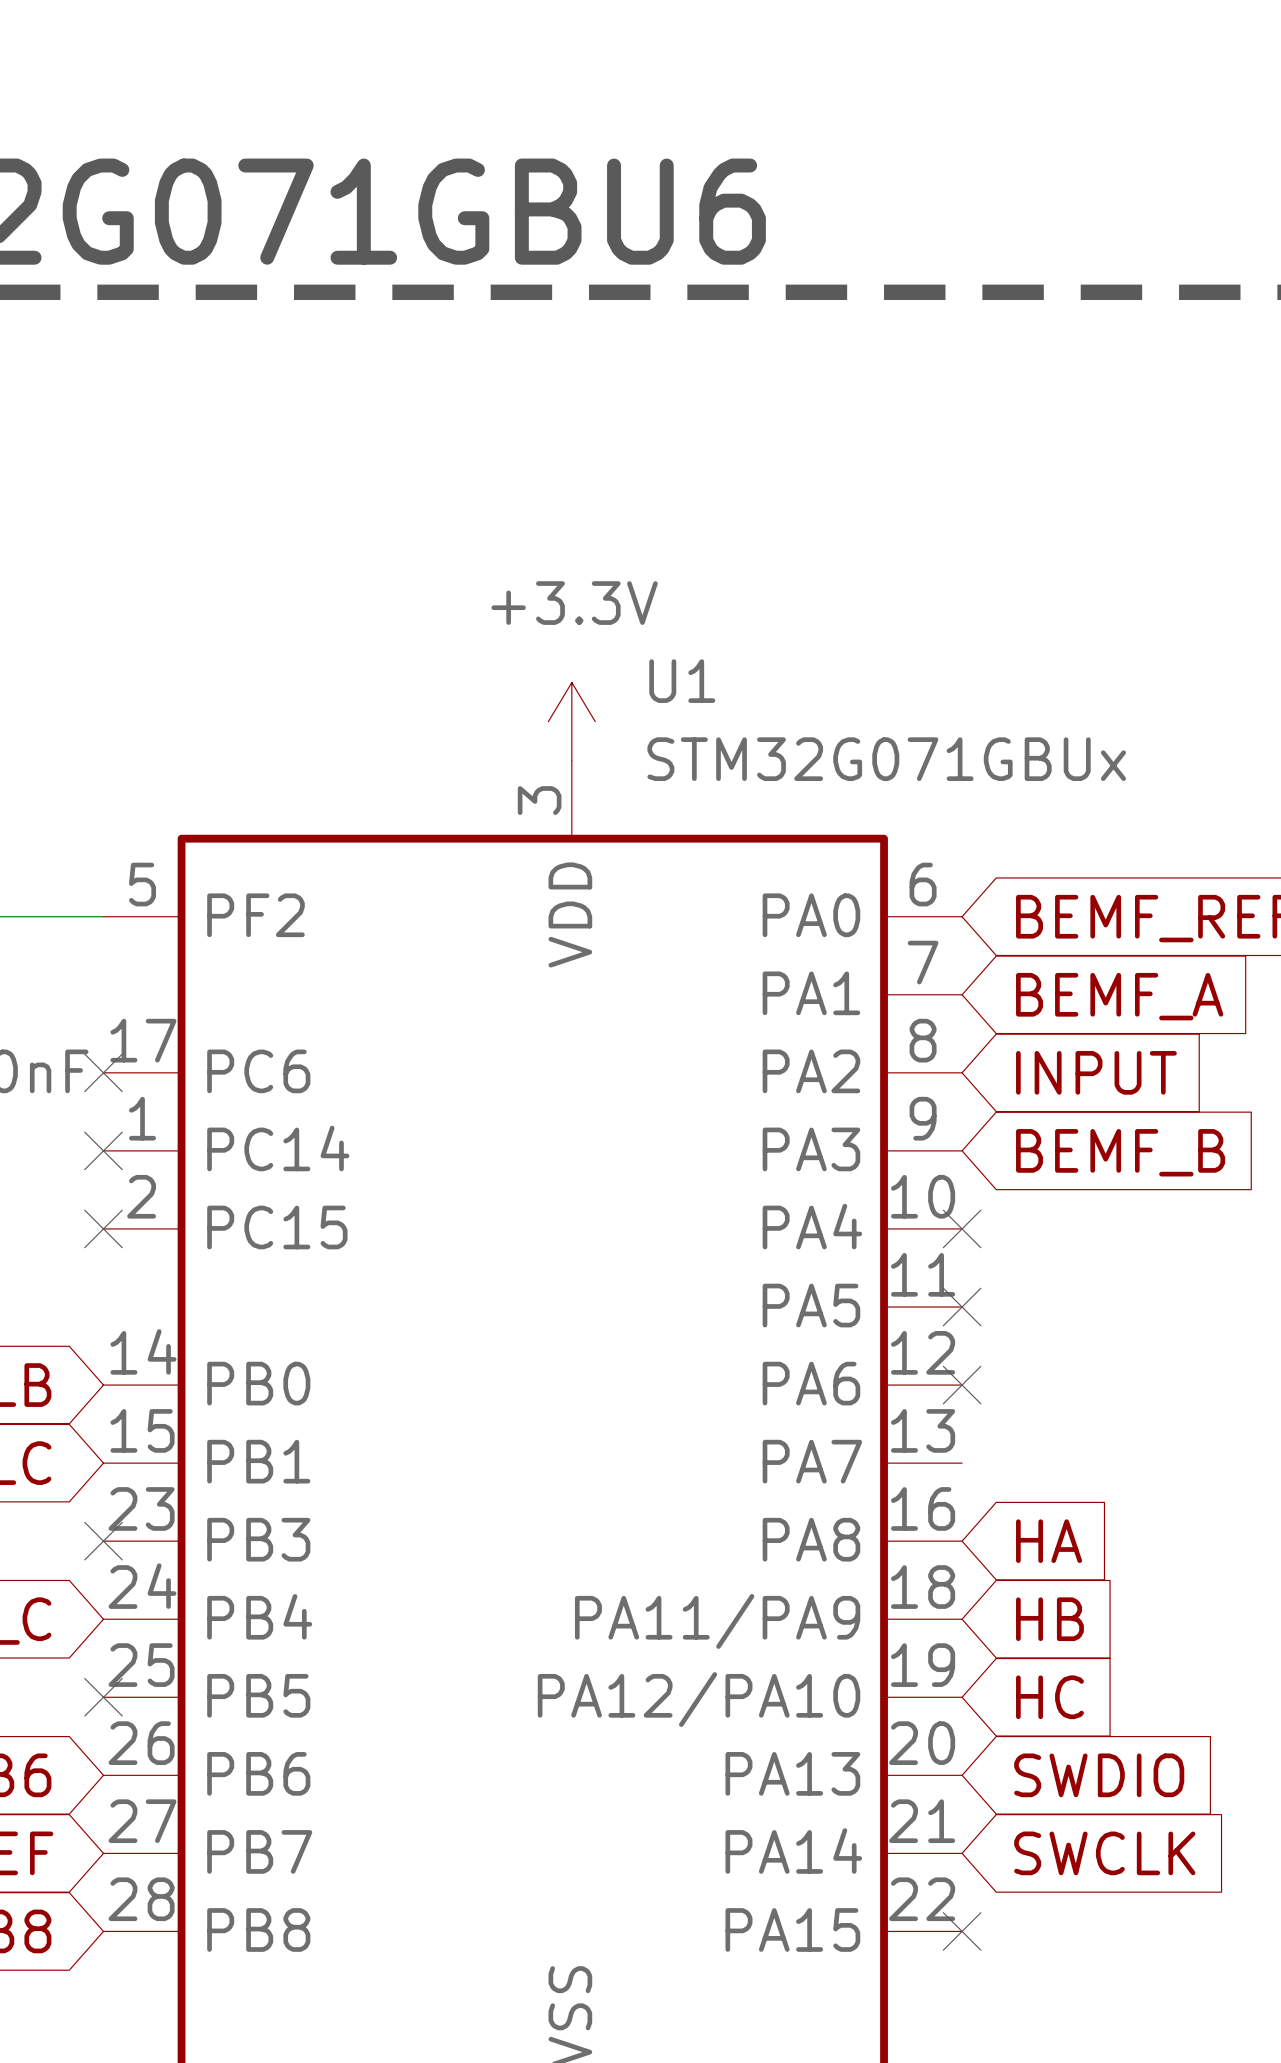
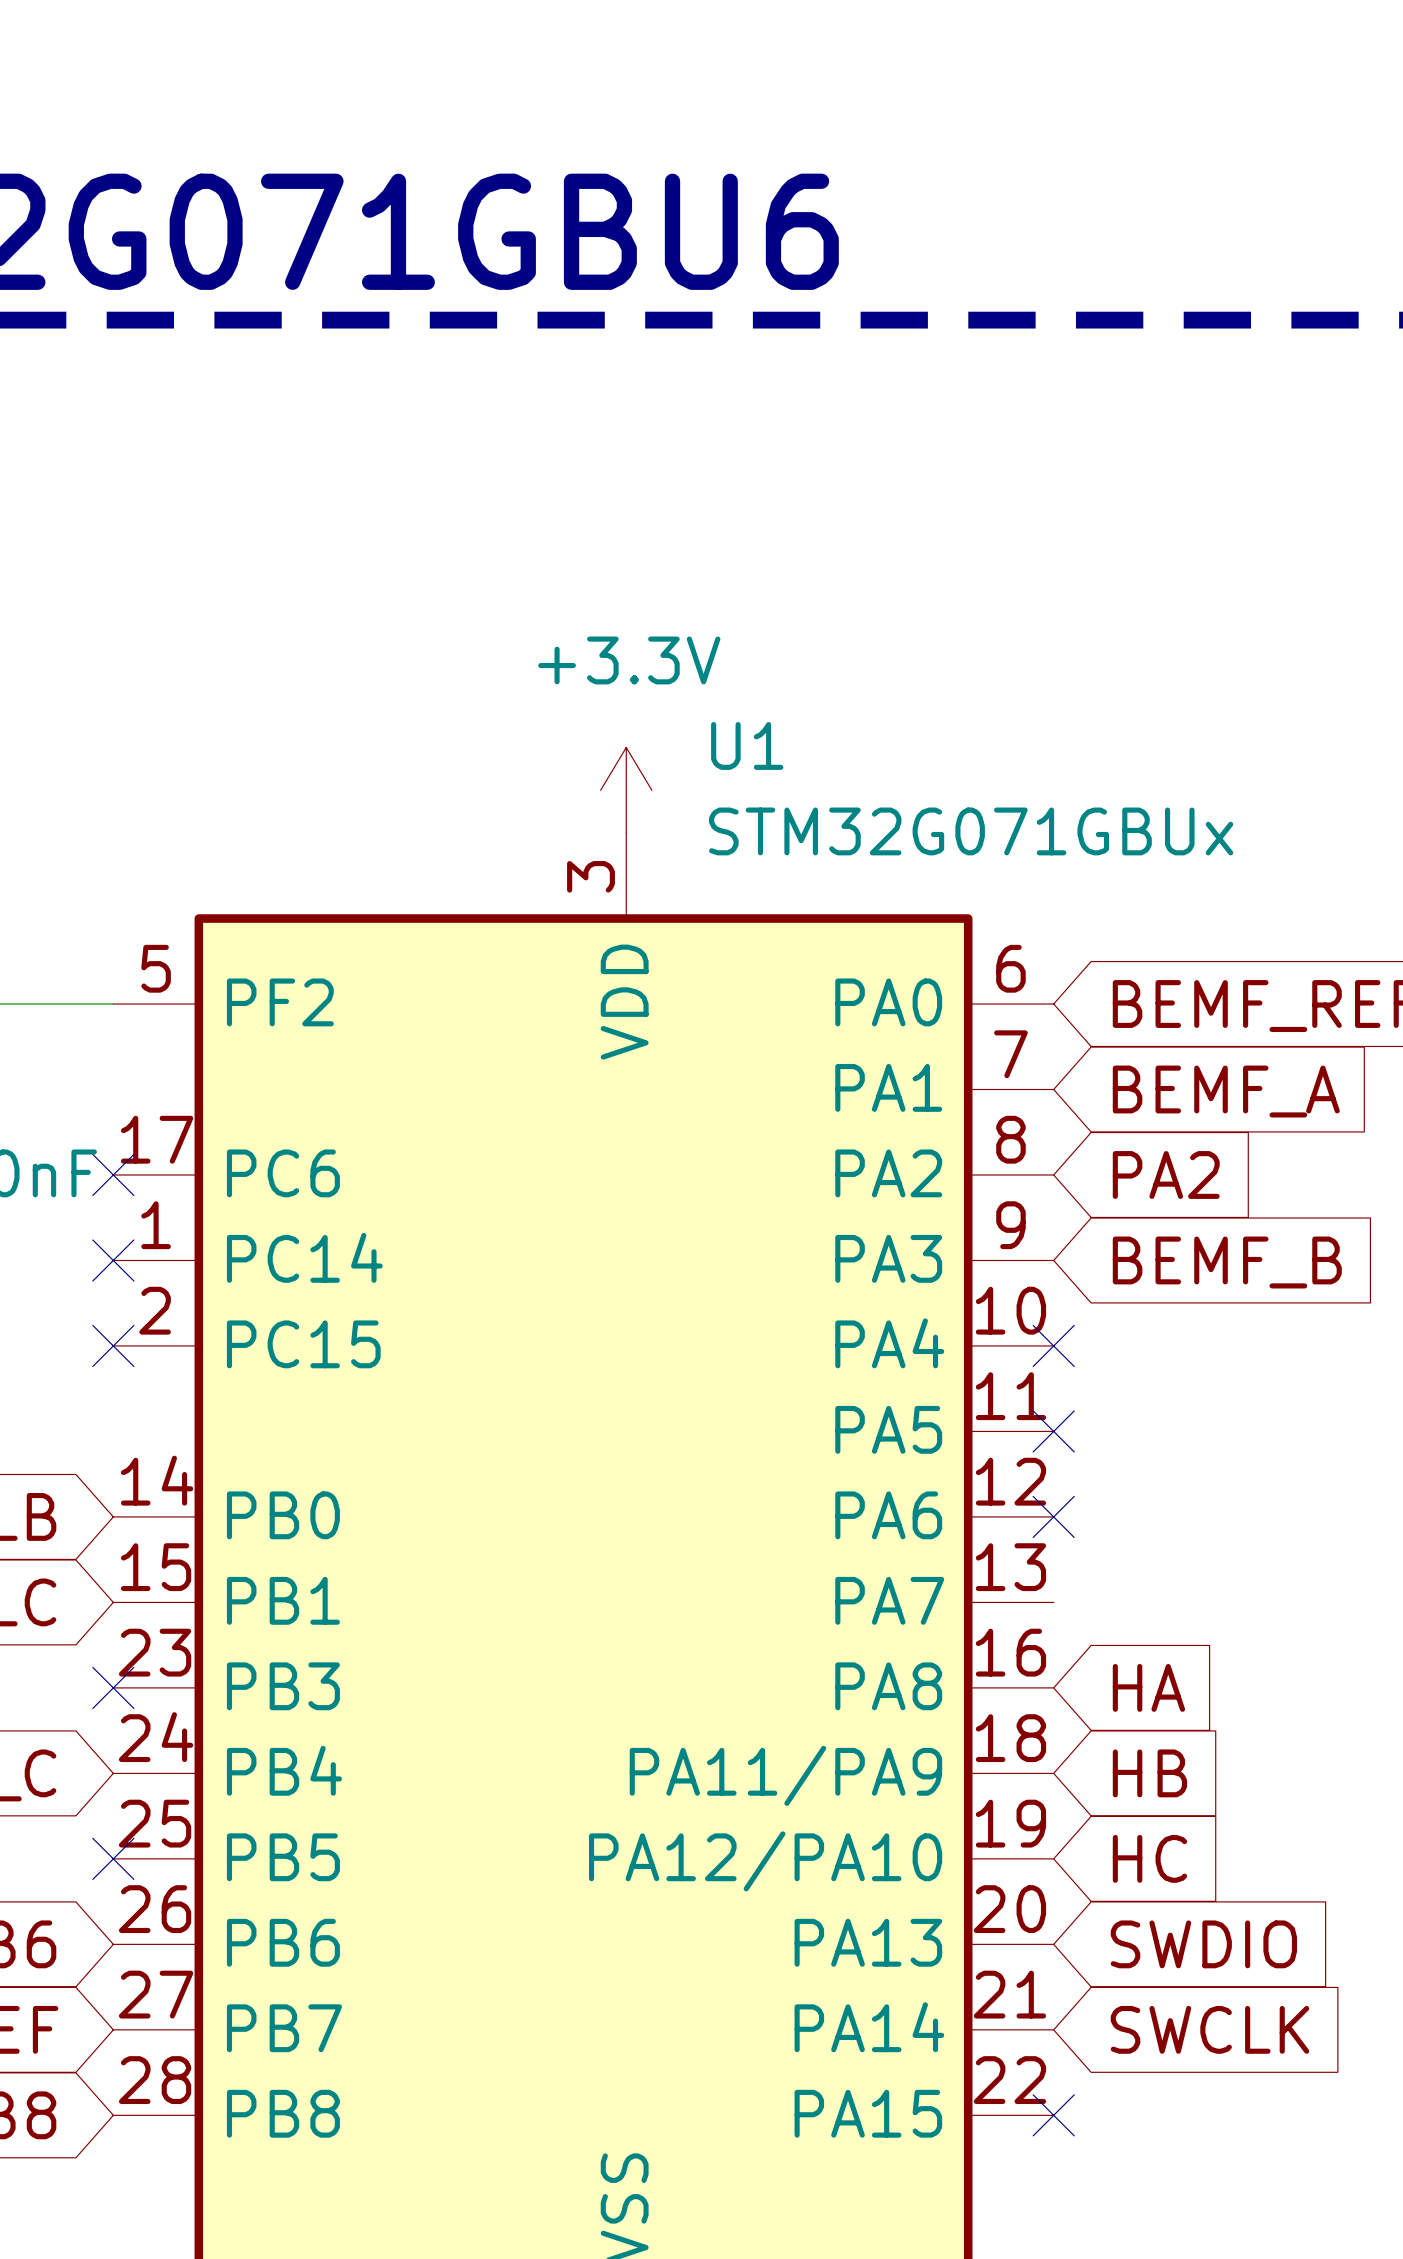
global label: INPUT (1096, 1072) -> PA2 (1166, 1174)

